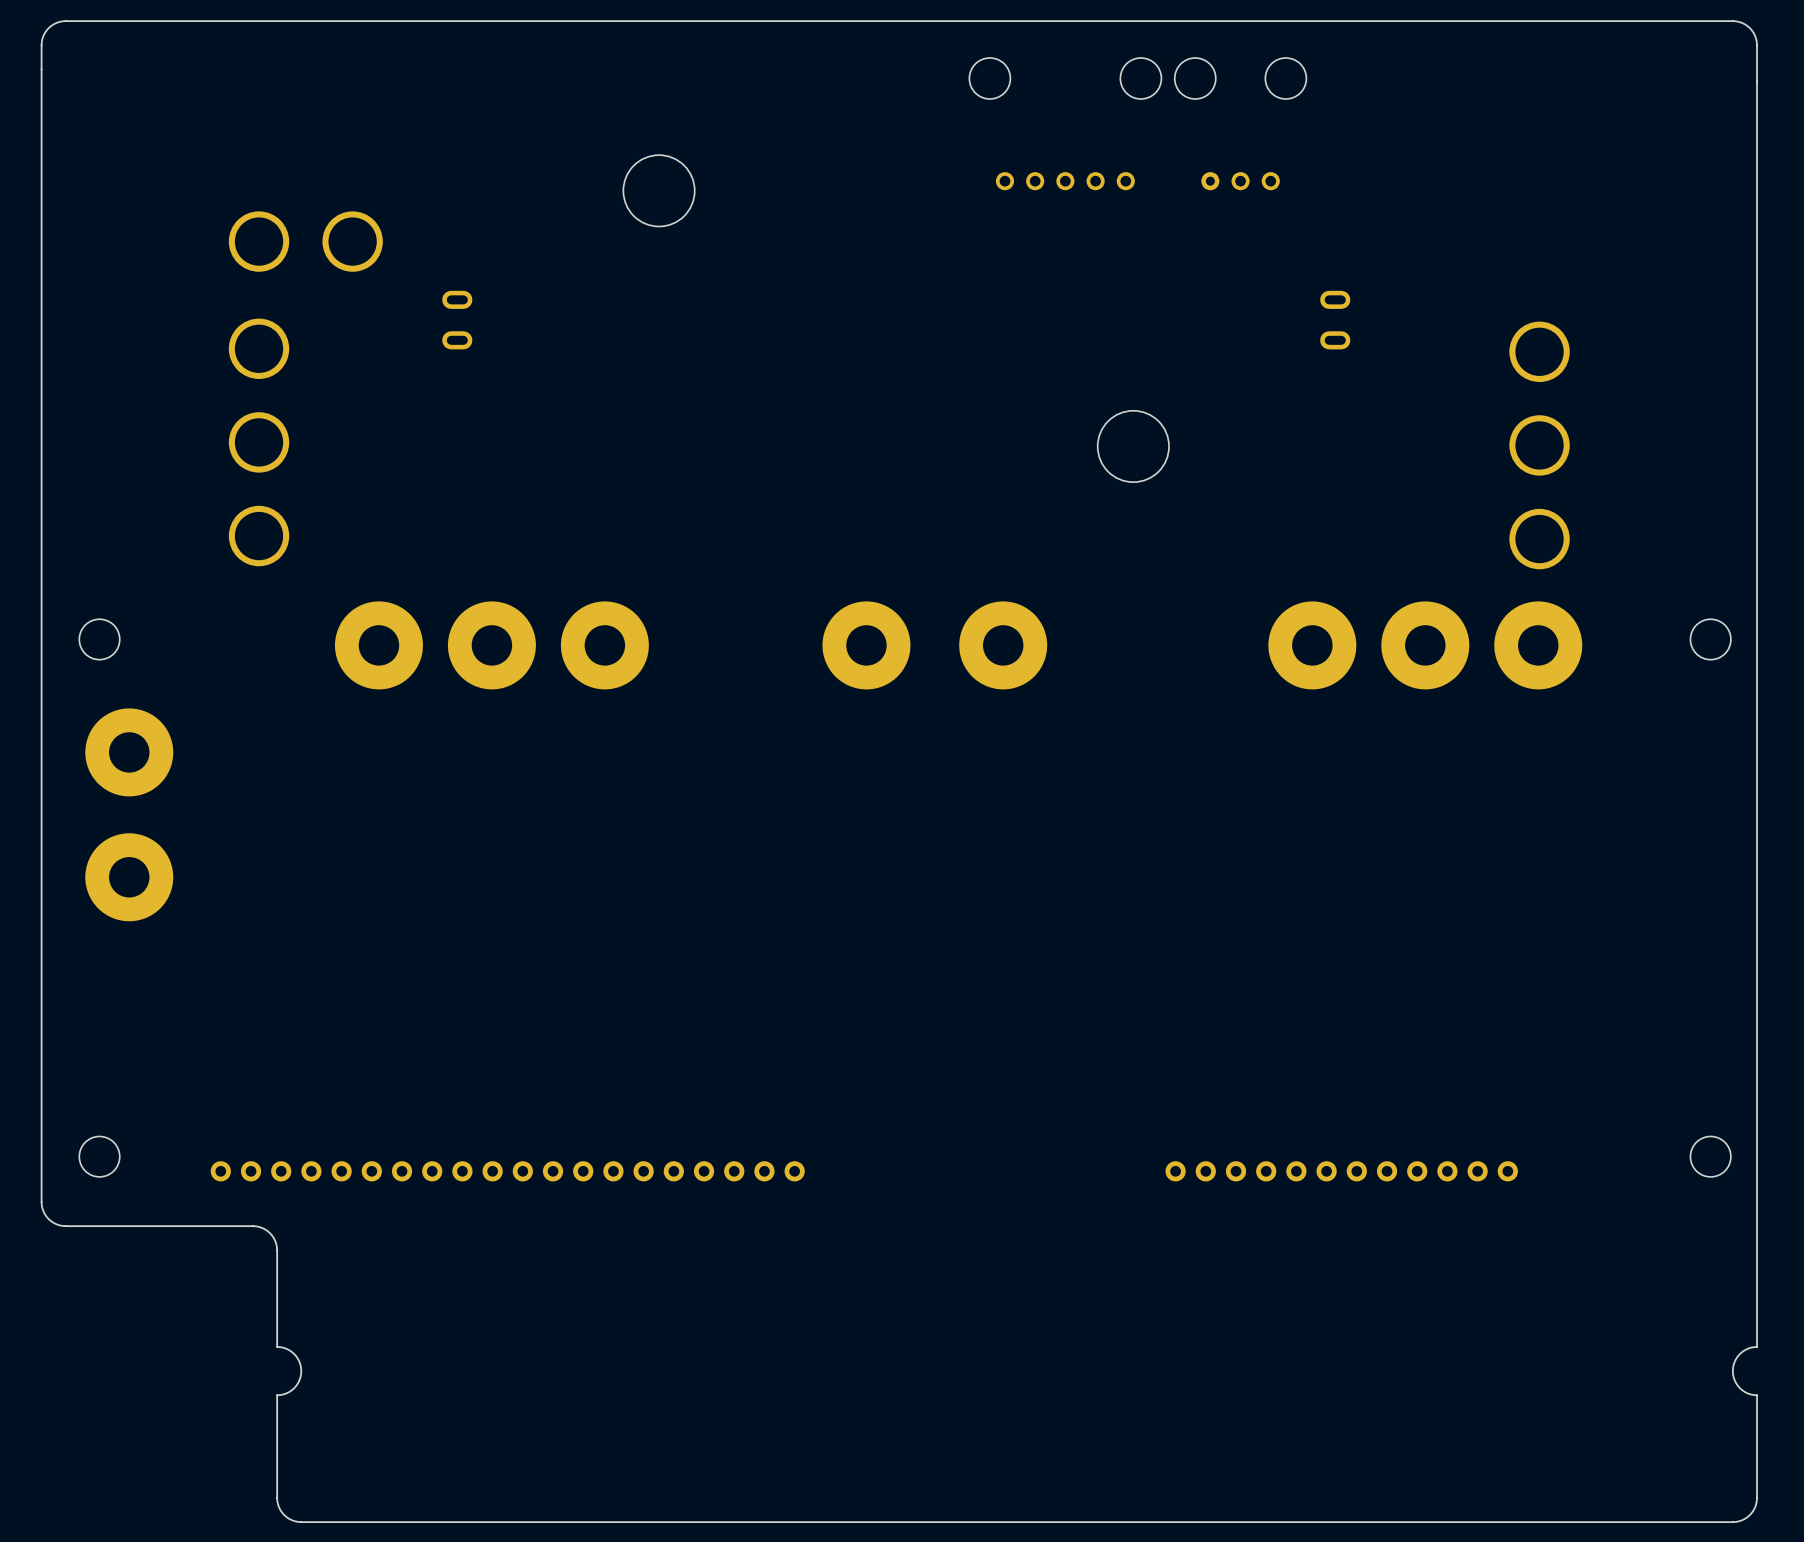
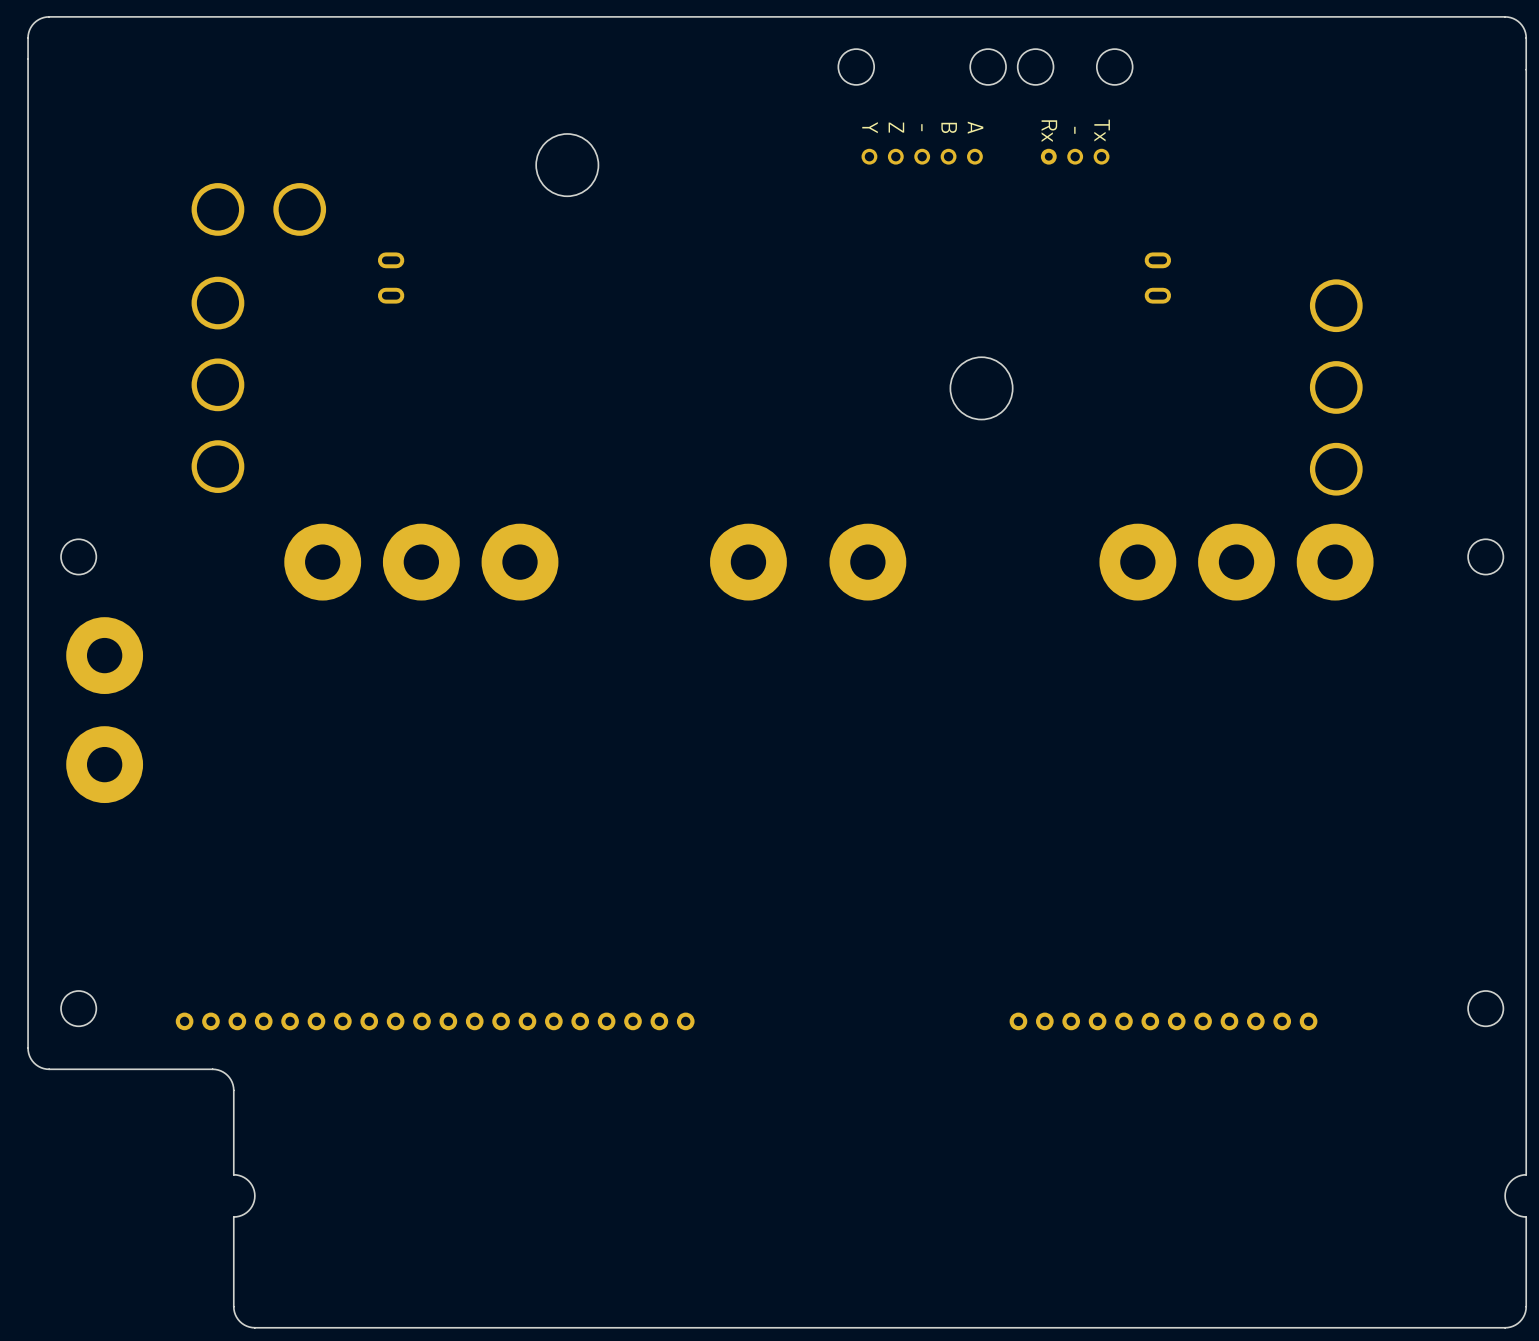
text: none -> Y (870, 127)
text: none -> Z (896, 127)
text: none -> - (921, 127)
text: none -> A (975, 127)
text: none -> B (949, 127)
text: none -> - (1074, 130)
text: none -> Rx (1049, 131)
text: none -> Tx (1102, 130)

